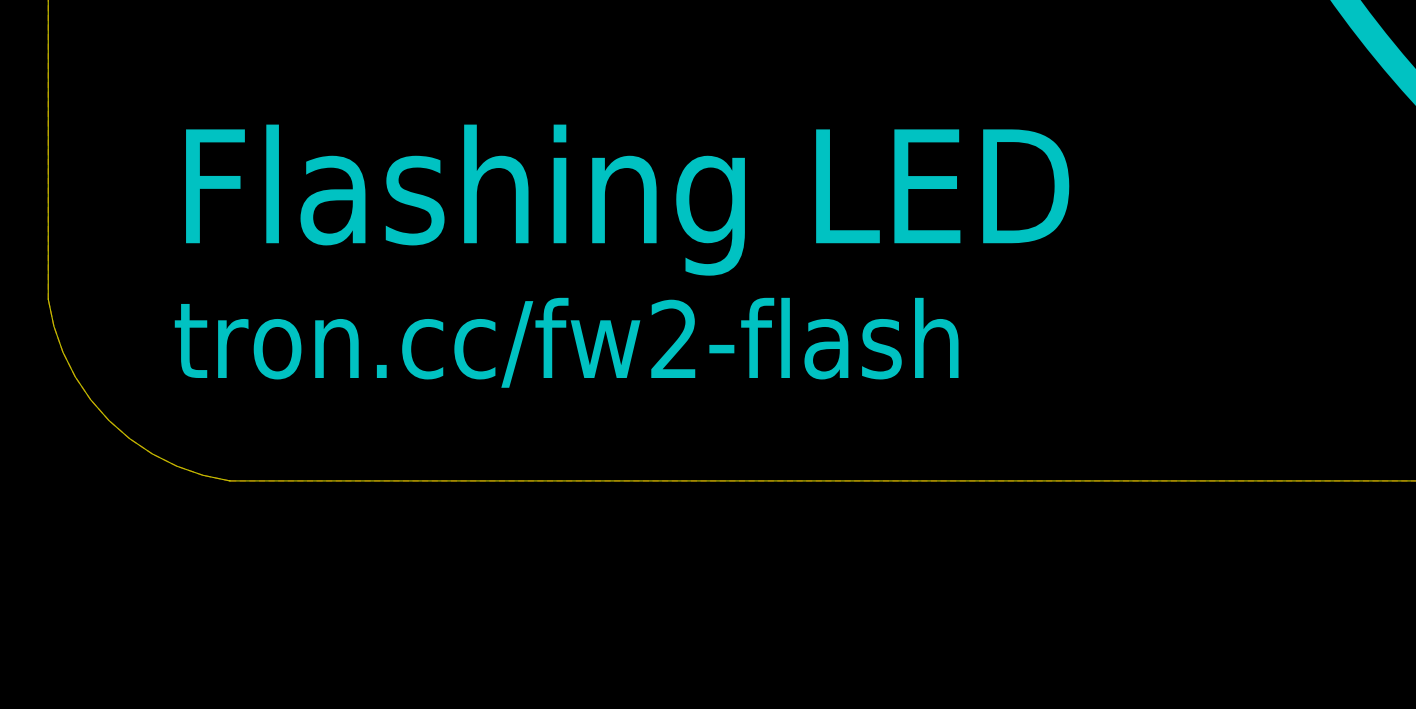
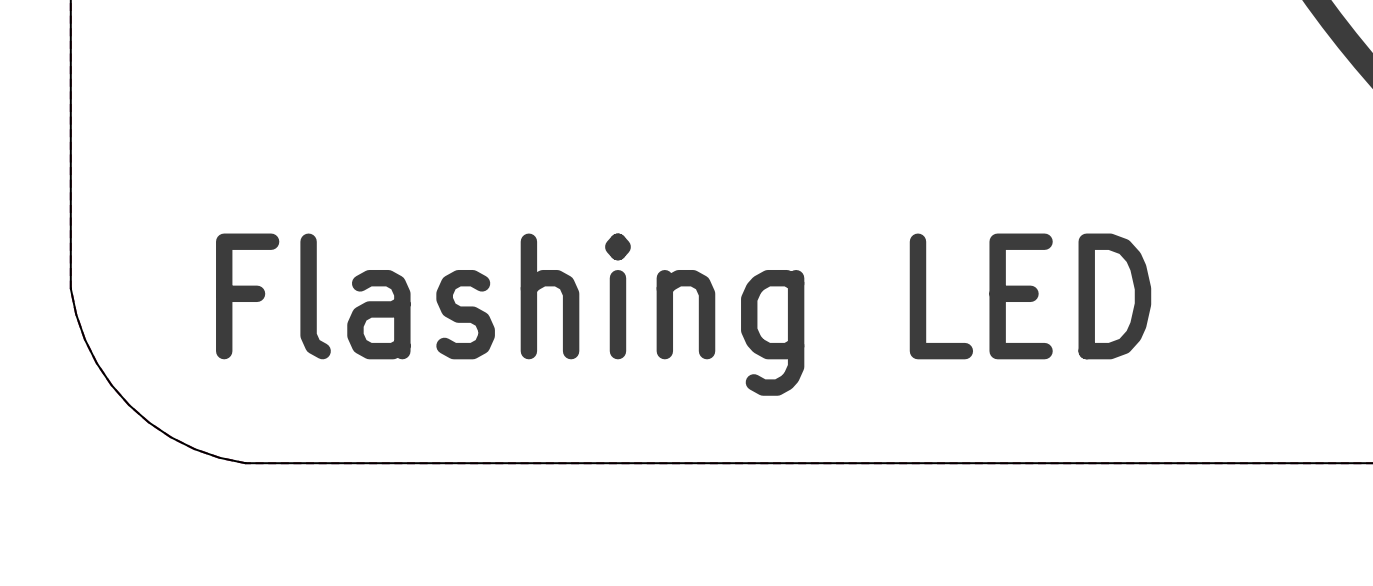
text position: Flashing LED (627, 200) -> Flashing LED (683, 314)
text: tron.cc/fw2-flash (566, 342) -> none

